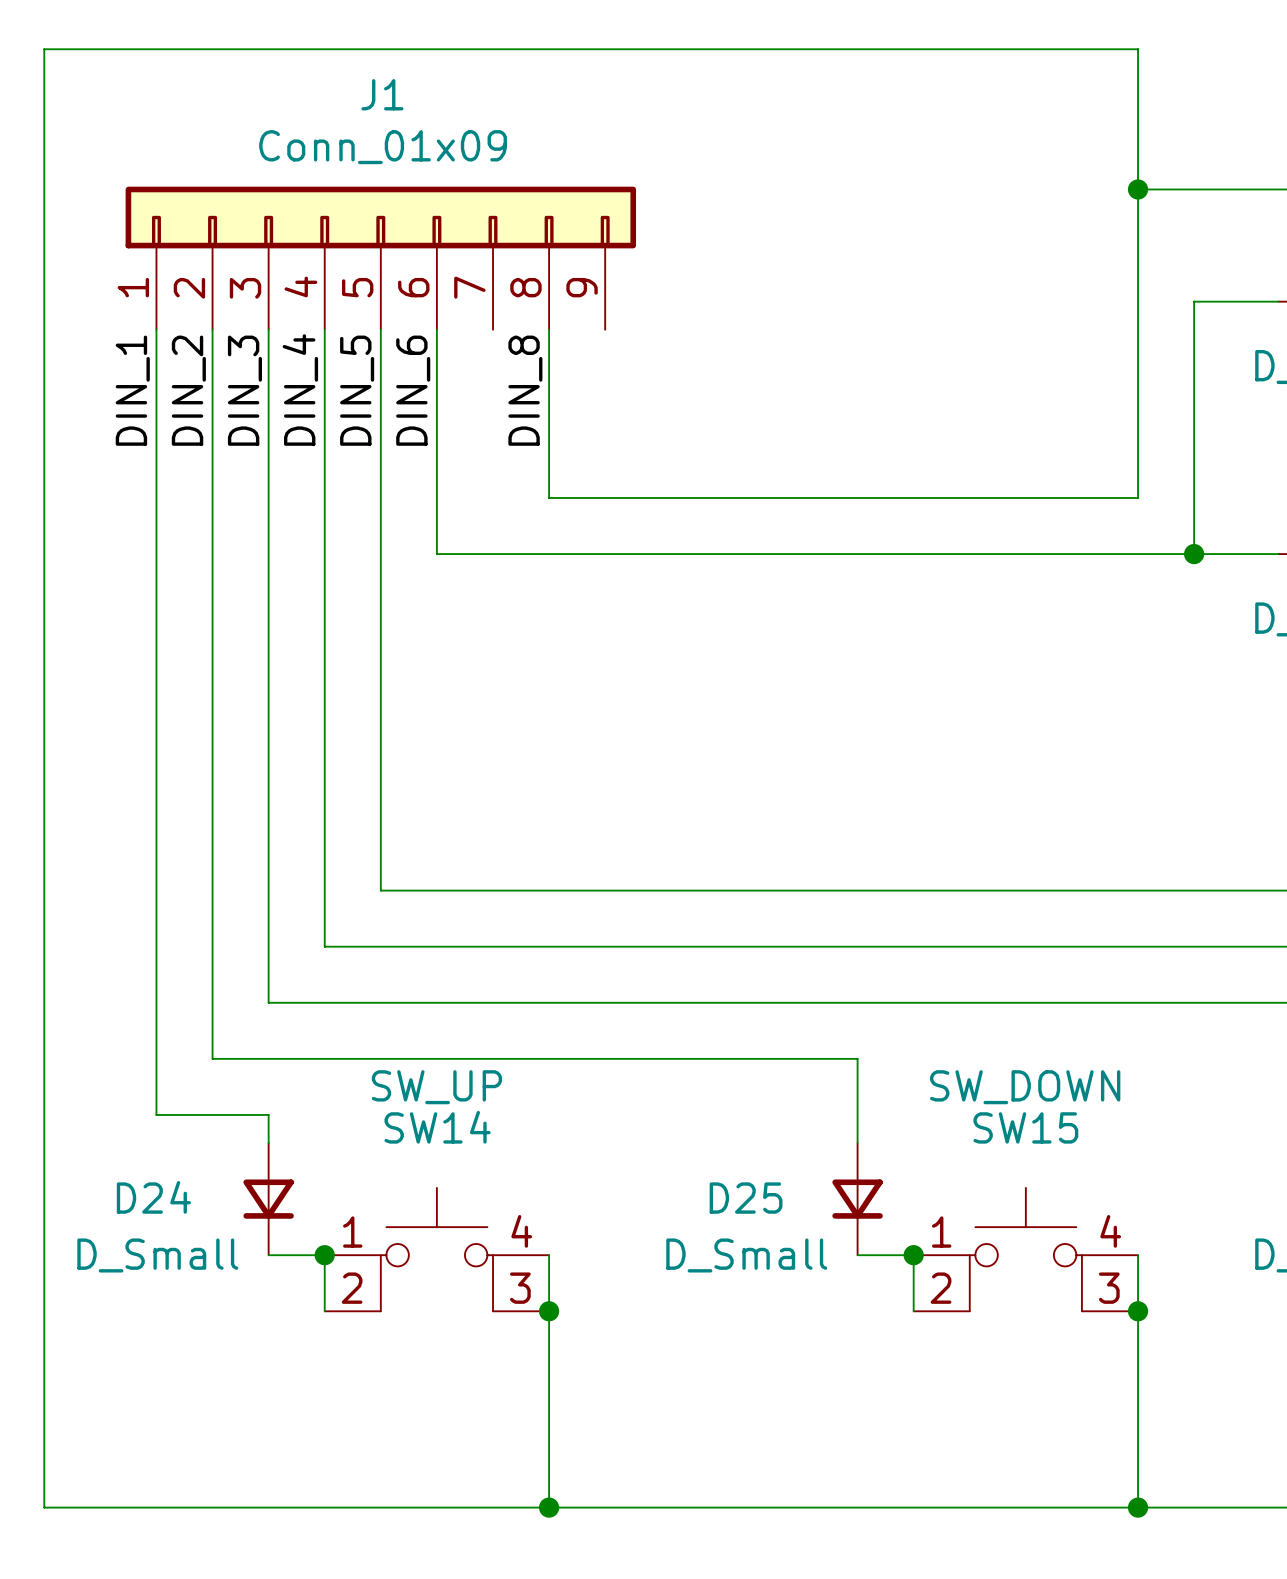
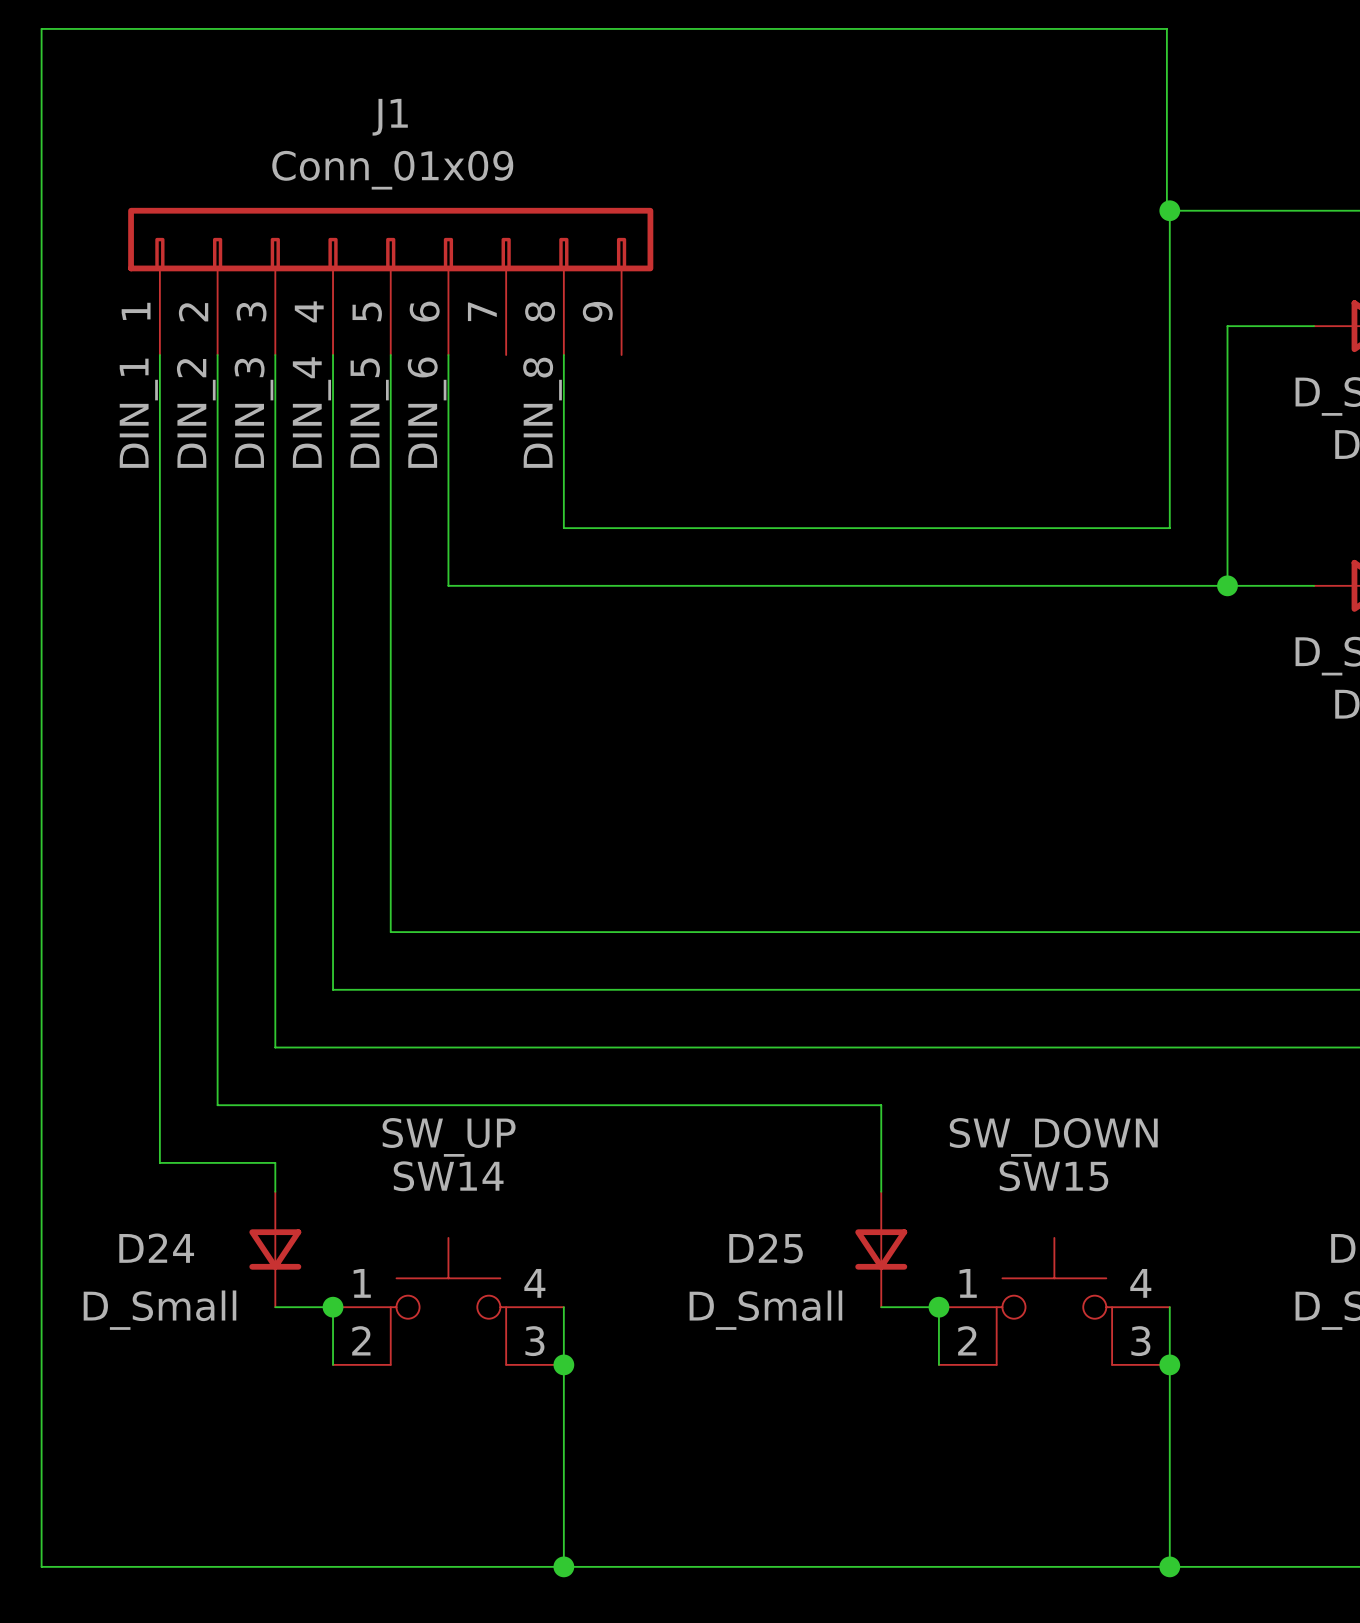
wire: (1138, 189) (1138, 49) (44, 49) (44, 1507) -> (1169, 210) (1166, 210) (1166, 28) (41, 28) (41, 1566) (44, 1566)

